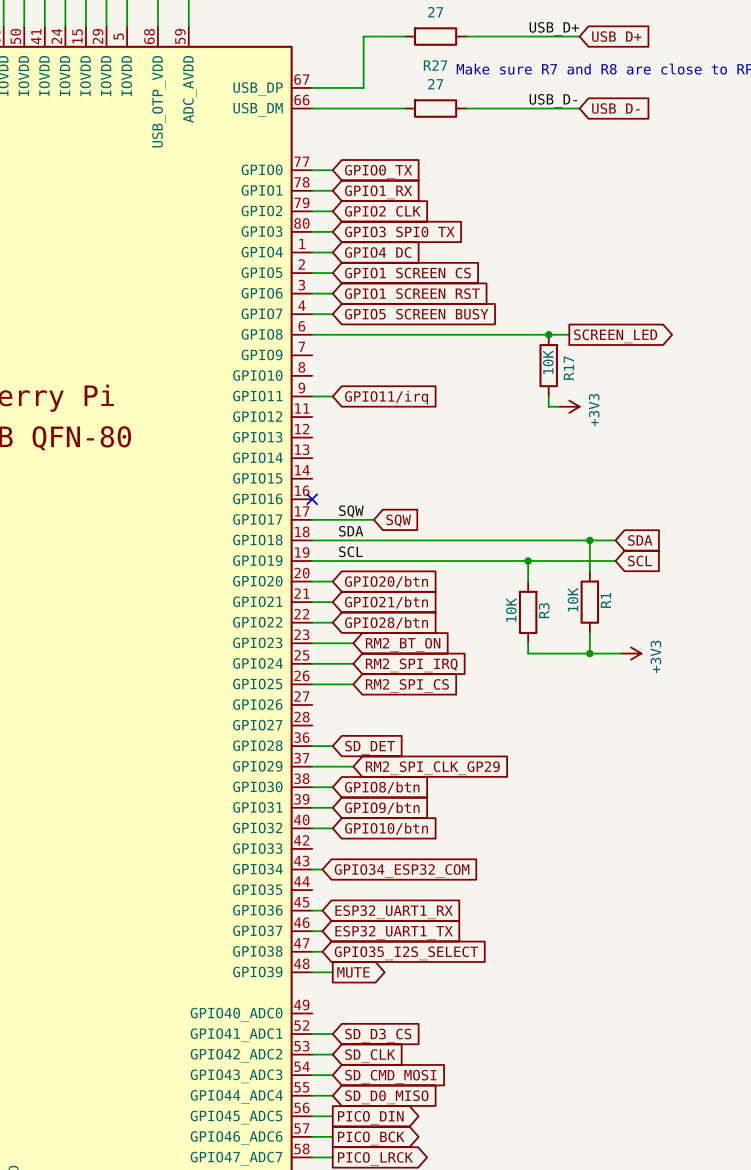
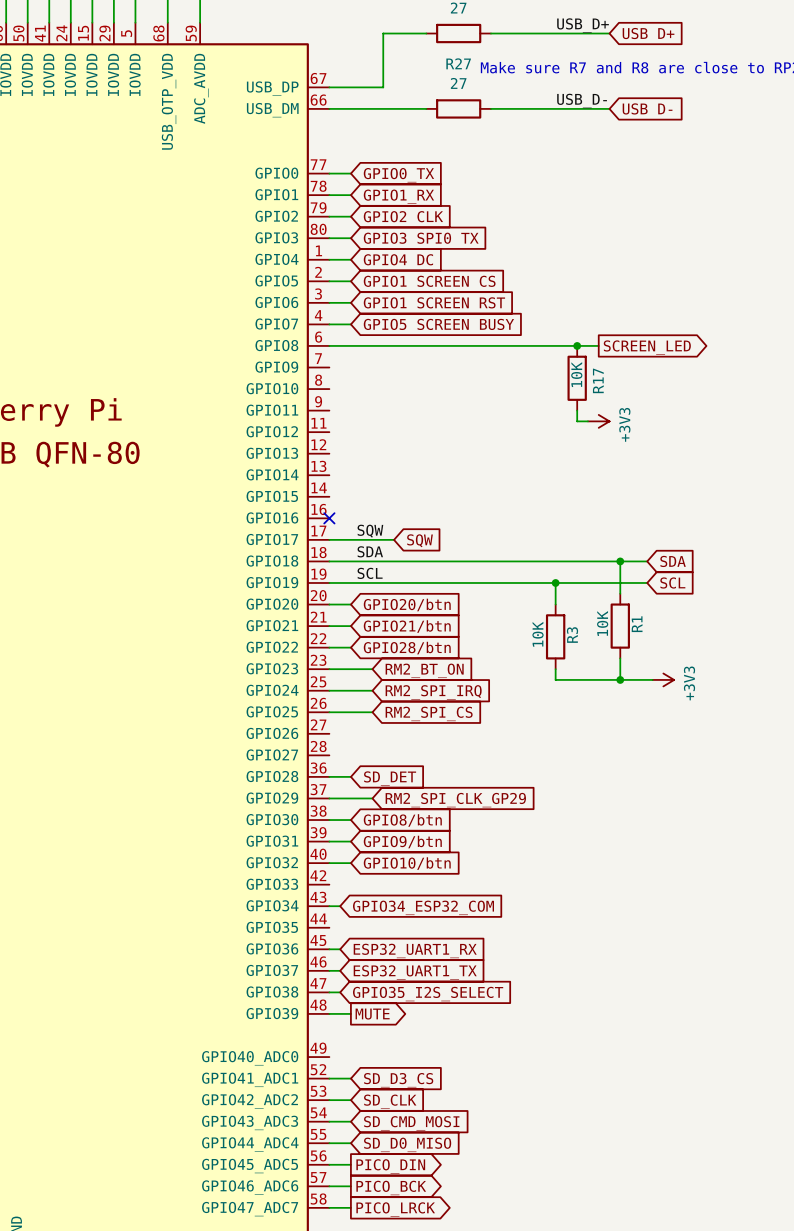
wire: (312, 396) (332, 396) -> none
global label: GPIO11/irq (386, 397) -> none

